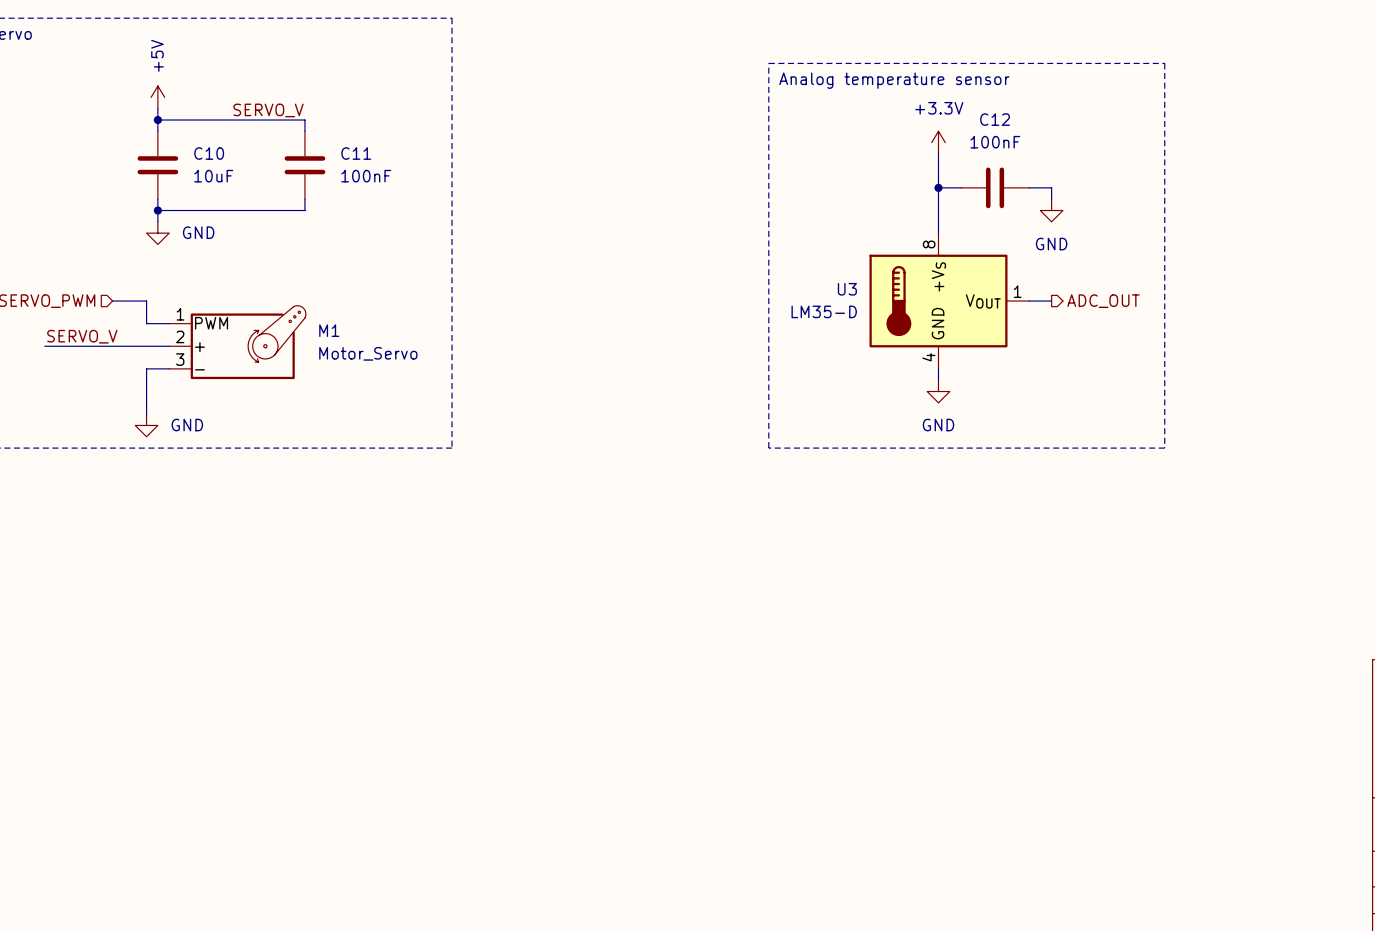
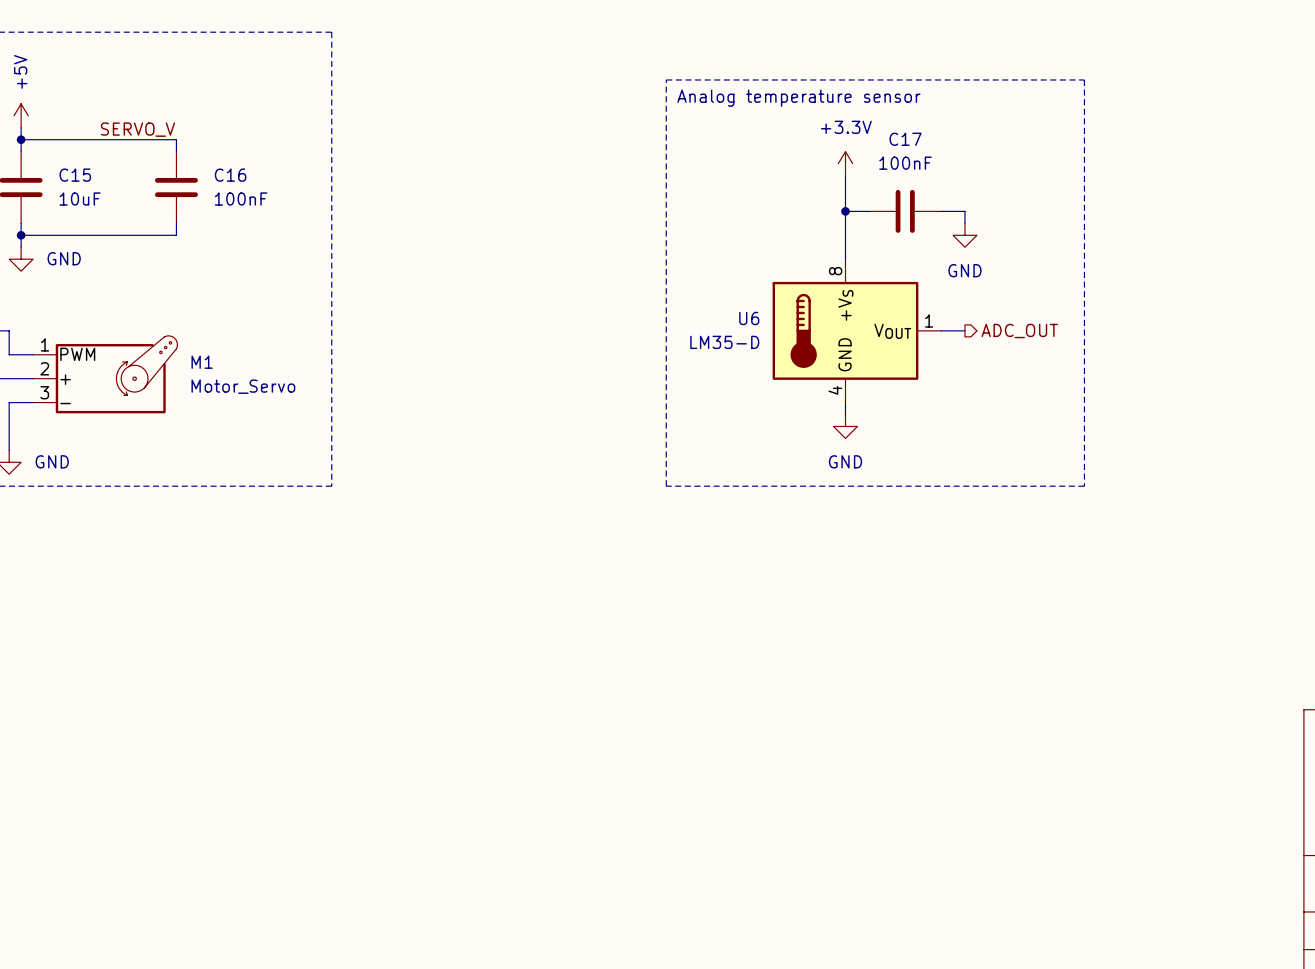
C12 name: C12 (995, 119) -> C17 (905, 139)
C10 name: C10 (209, 153) -> C15 (75, 175)
C11 name: C11 (356, 153) -> C16 (230, 175)
U3 name: U3 (847, 289) -> U6 (749, 318)

